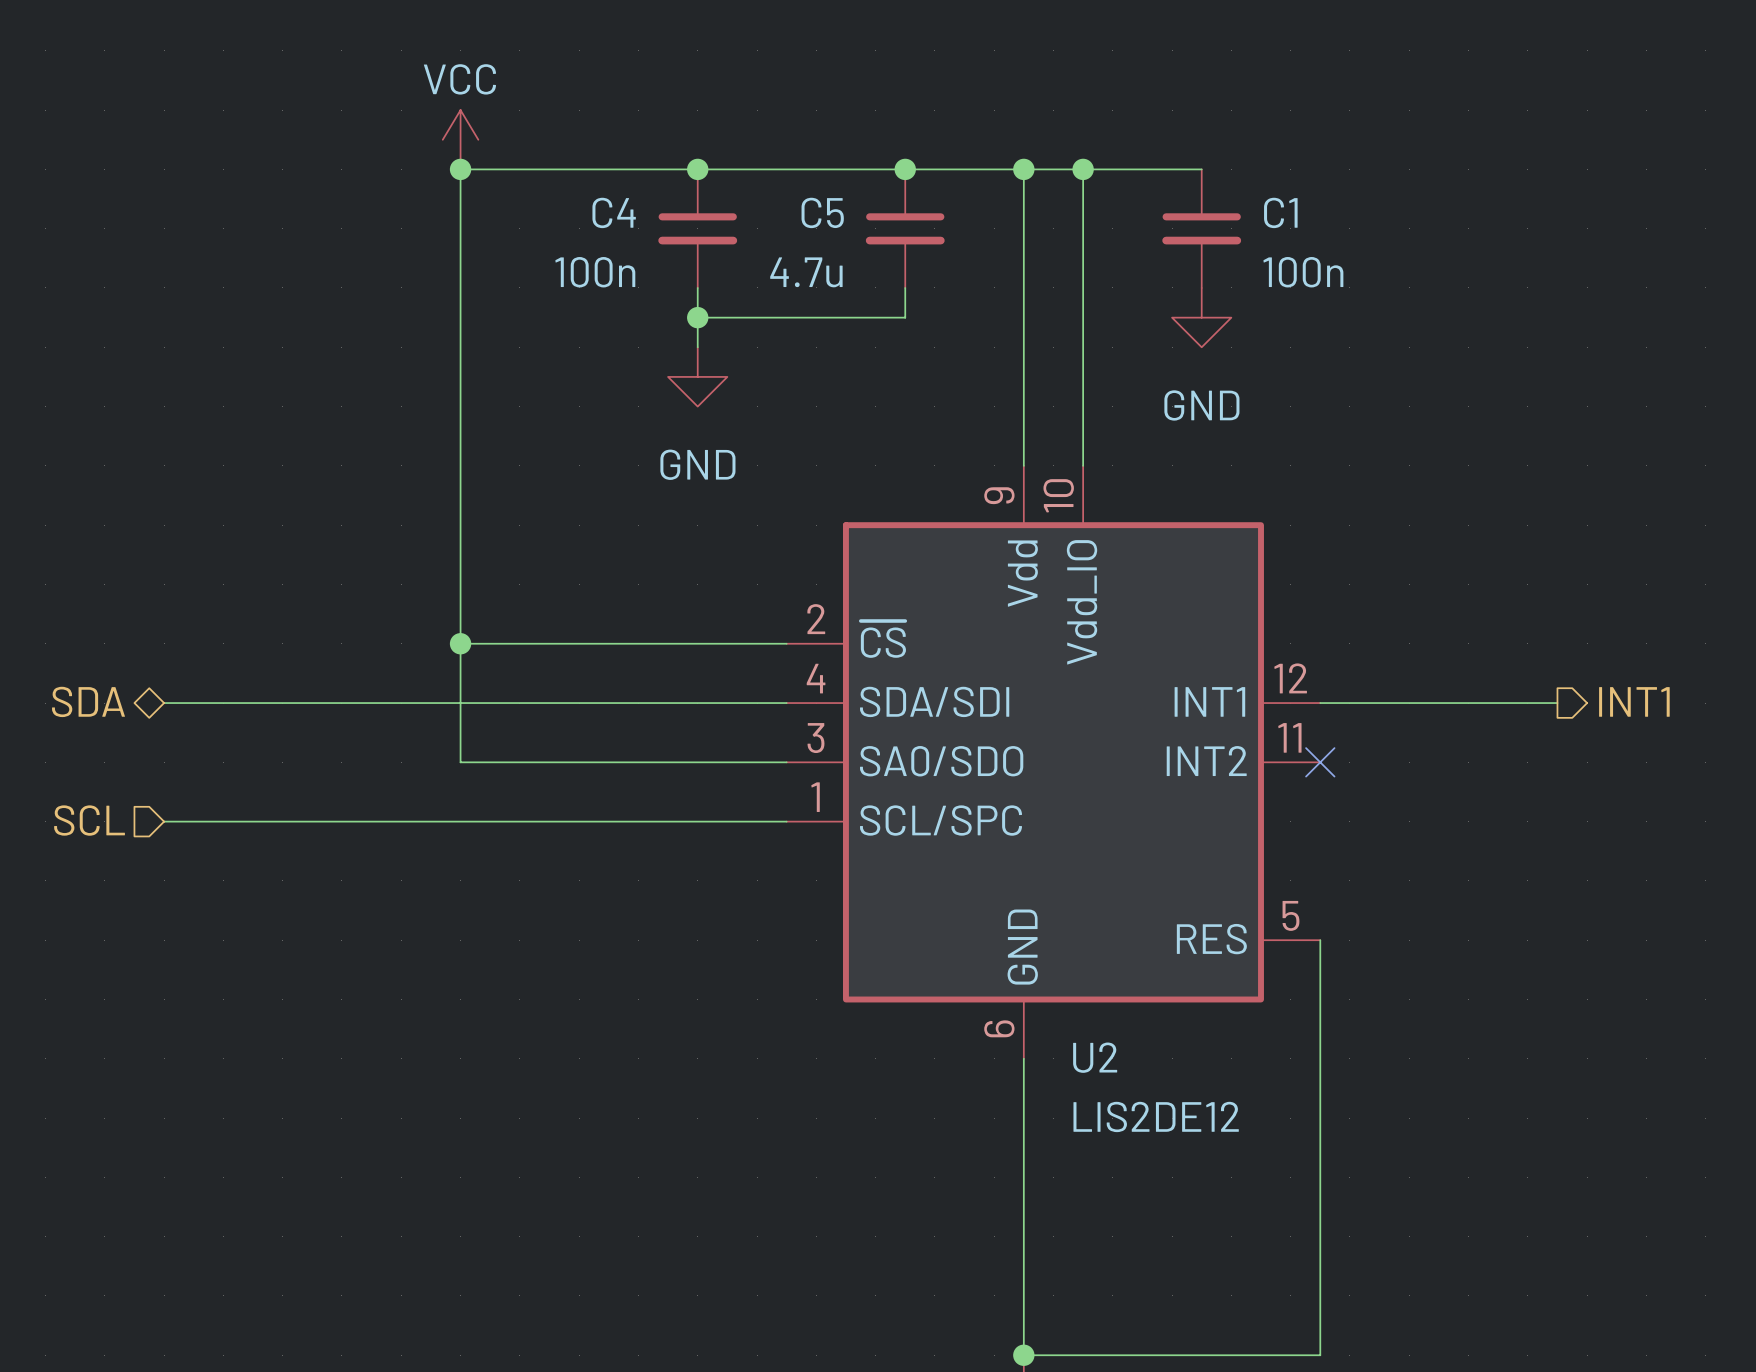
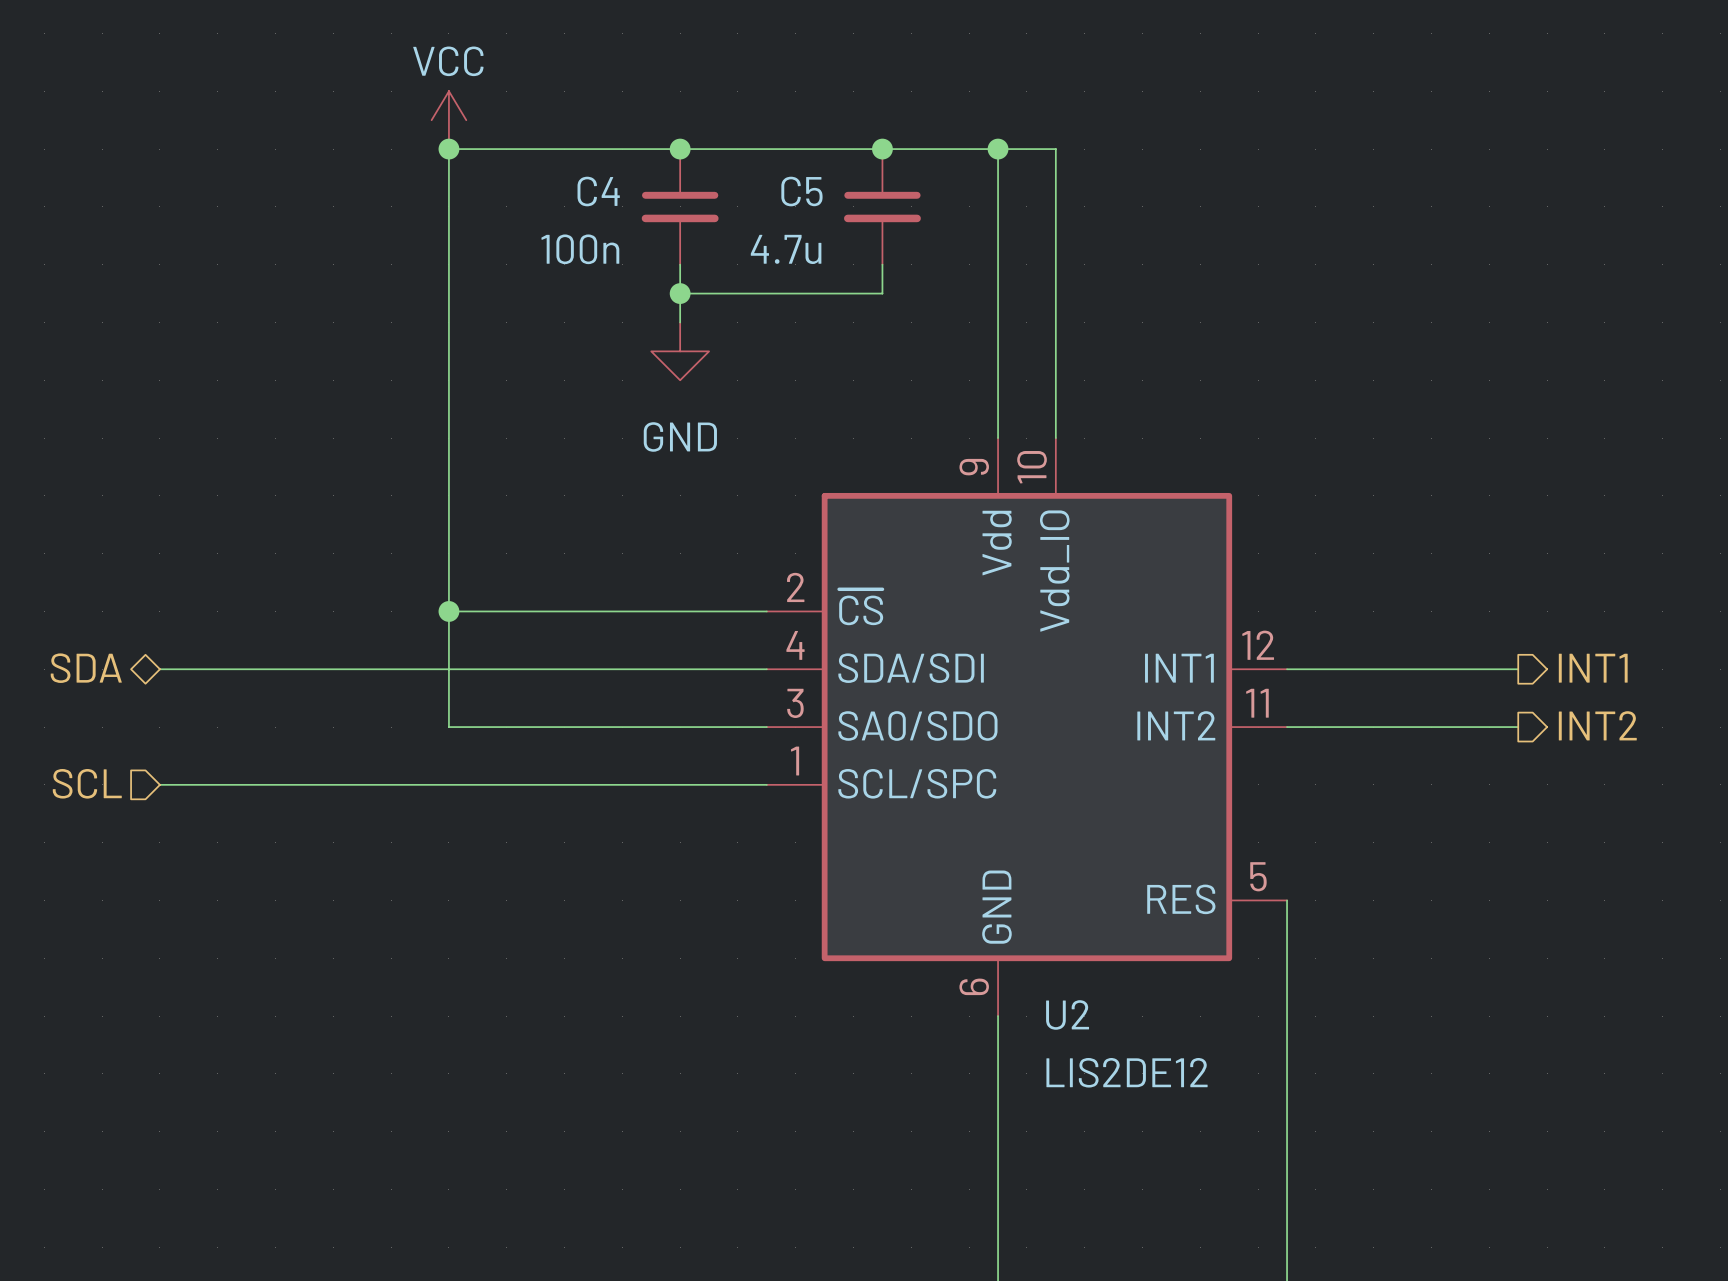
wire: (1083, 169) (1201, 169) -> none
junction: (1083, 169) -> none
C1: 100n (1201, 228) -> none
power symbol: GND (1201, 317) -> none
hierarchical label: none -> INT2 (1597, 725)
wire: none -> (1287, 727) (1518, 727)
no-connect mark: (1320, 762) -> none

